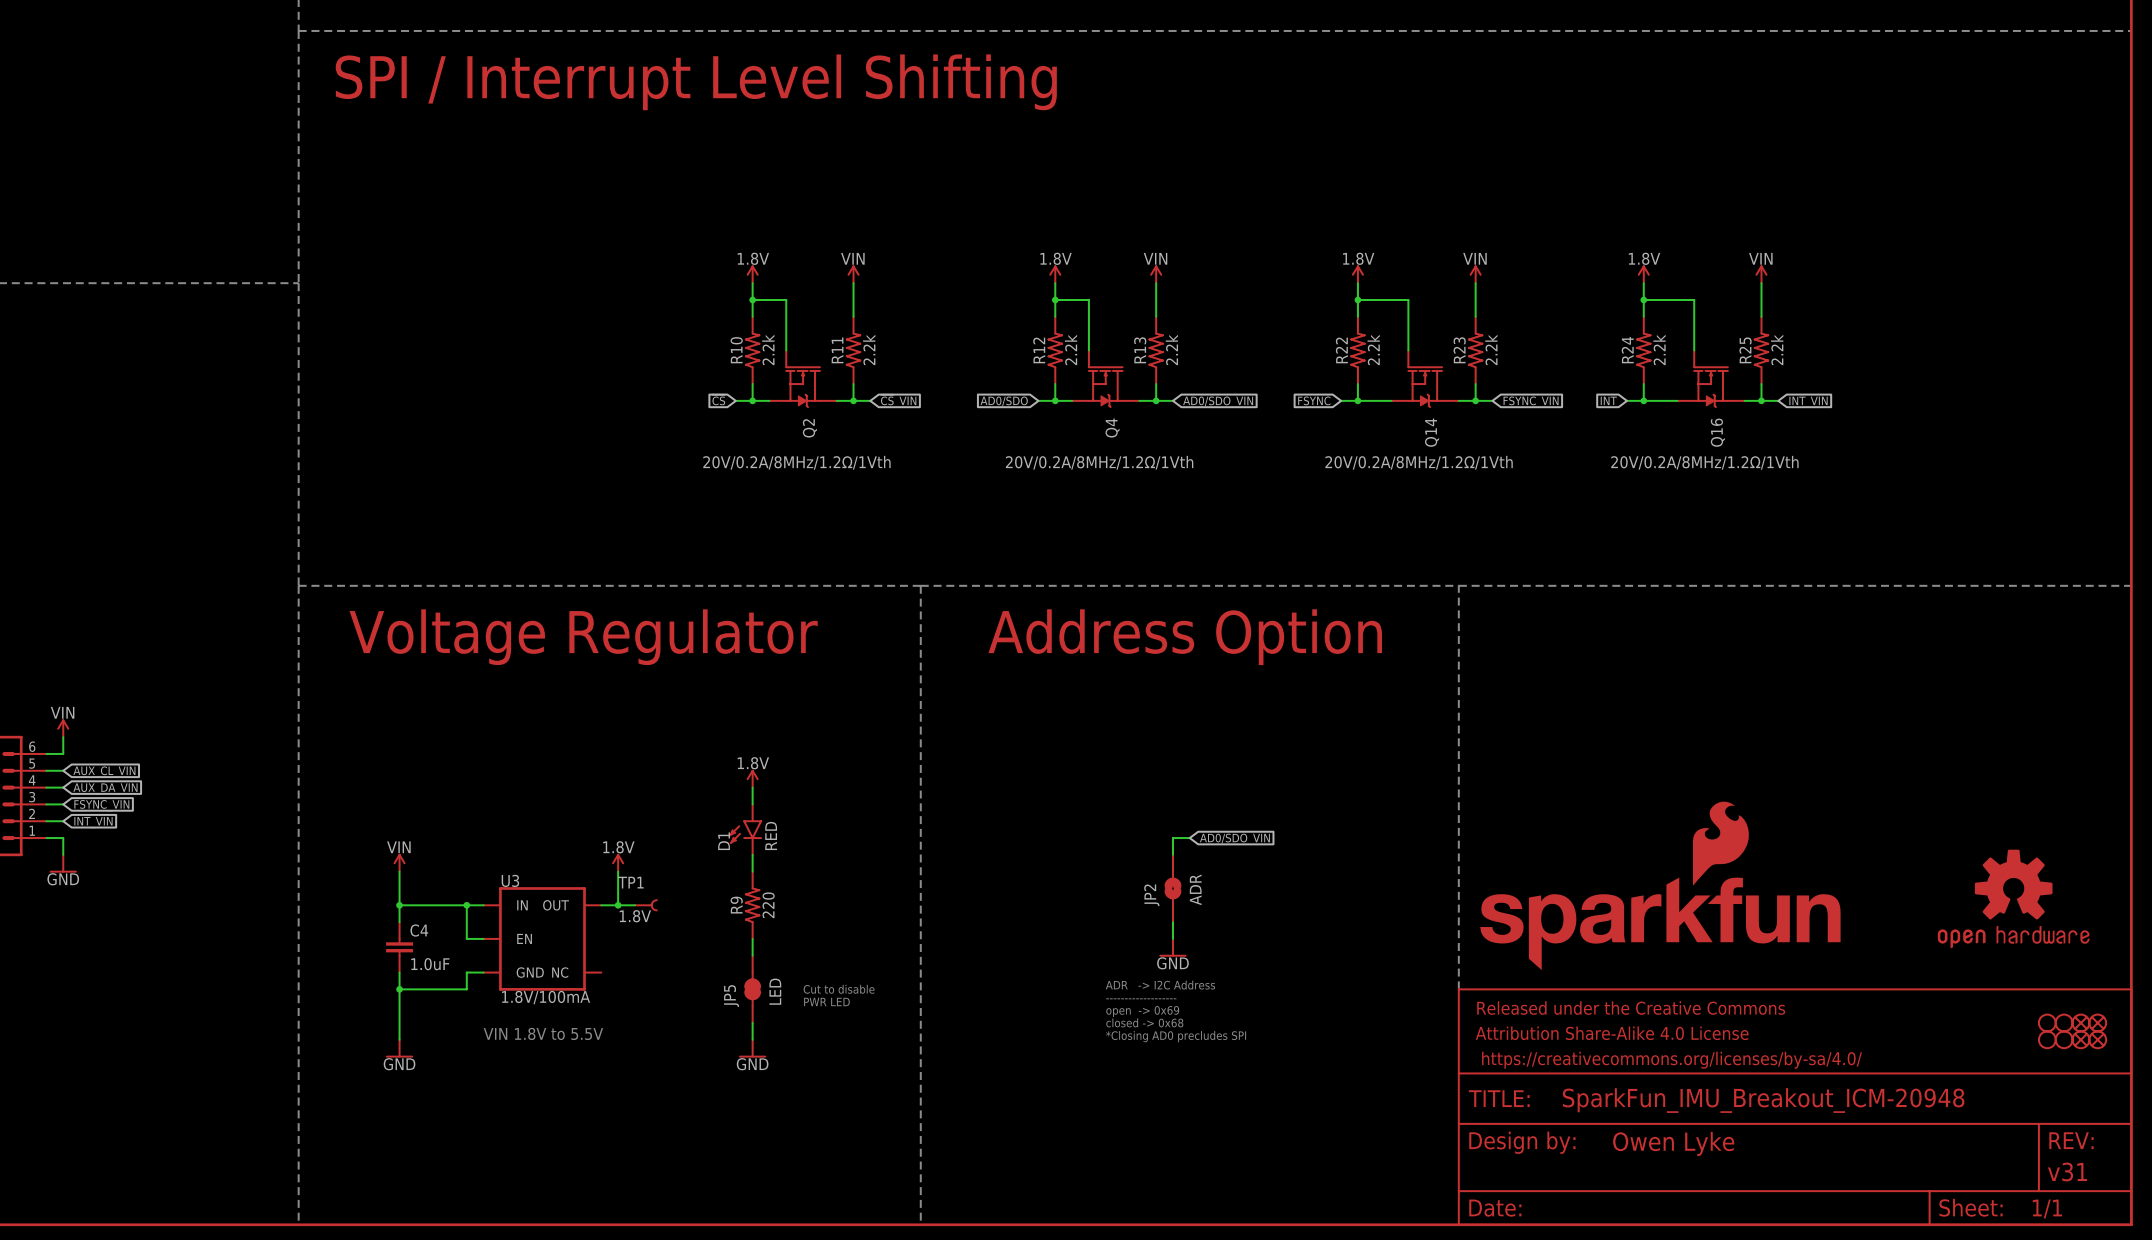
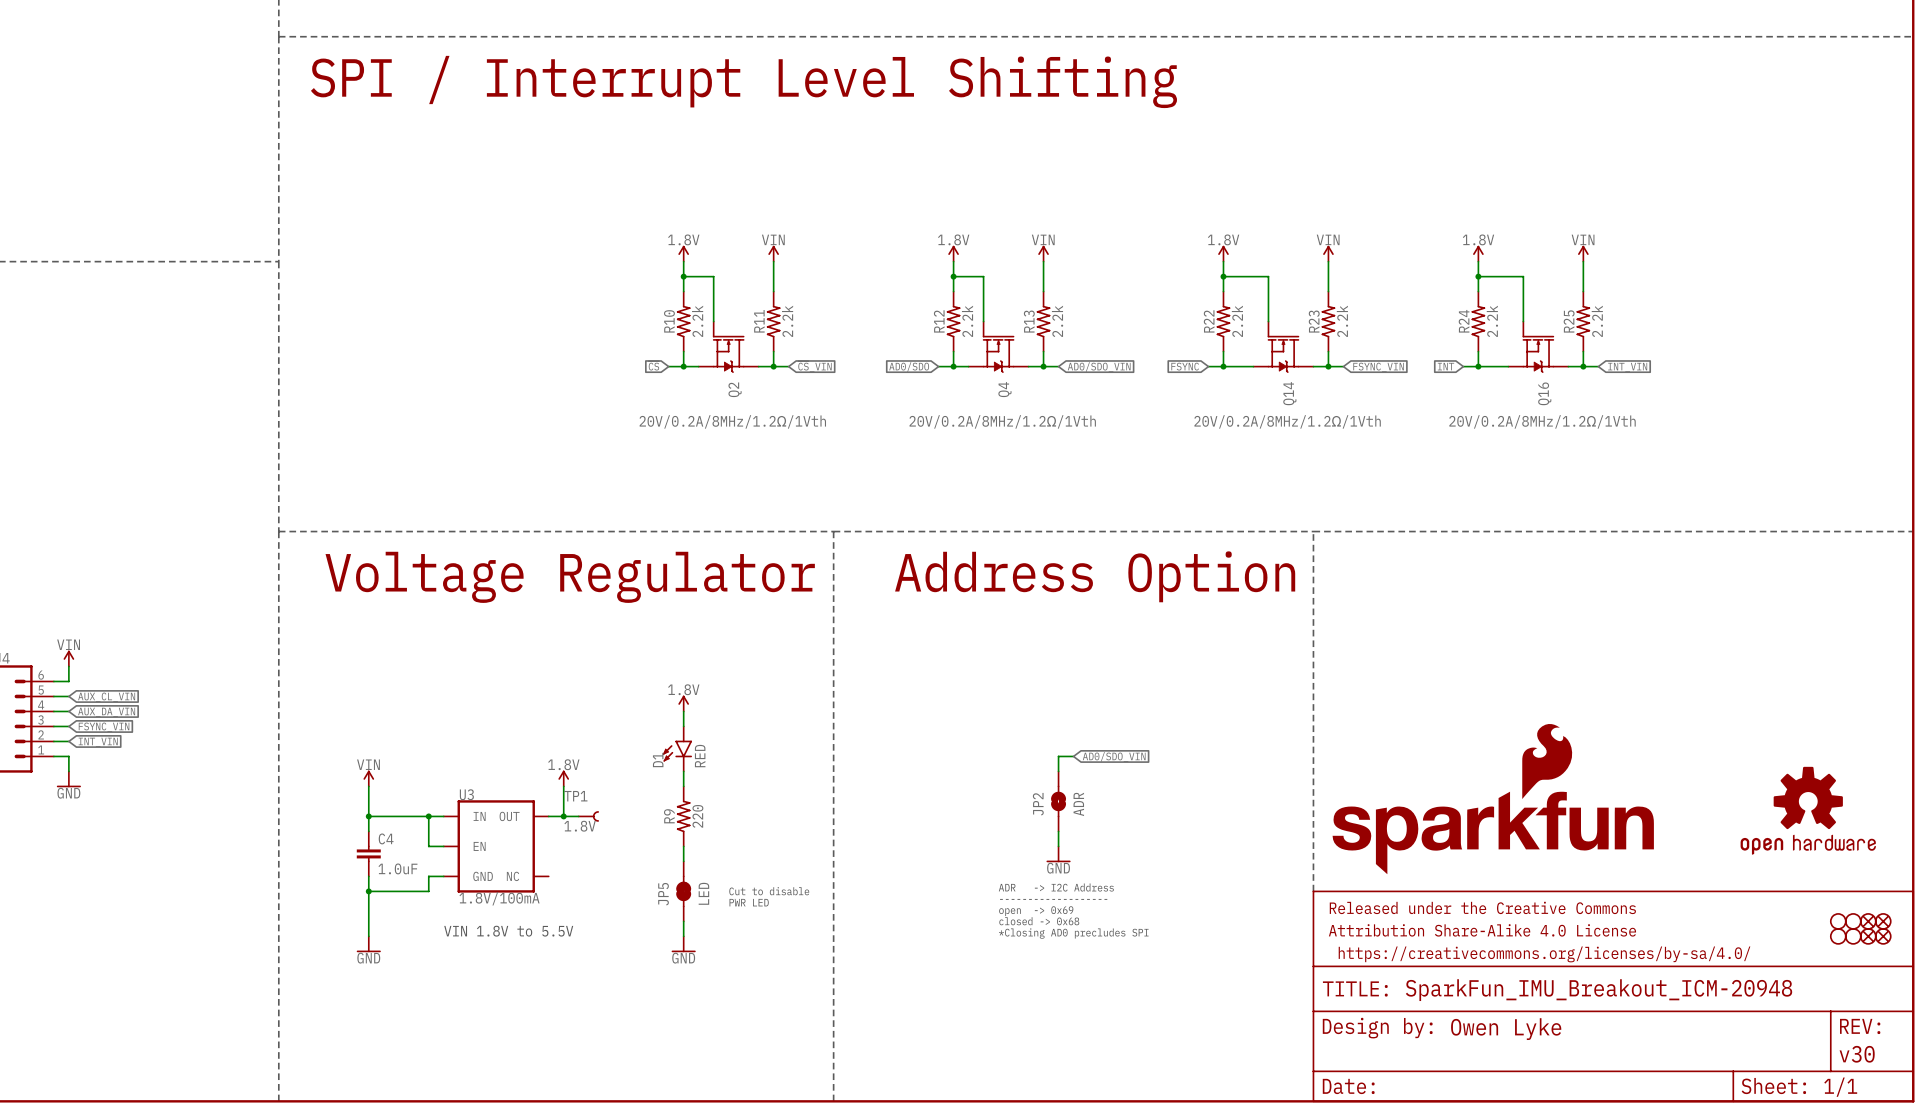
part text: v31 (2067, 1171) -> v30 (1857, 1054)

